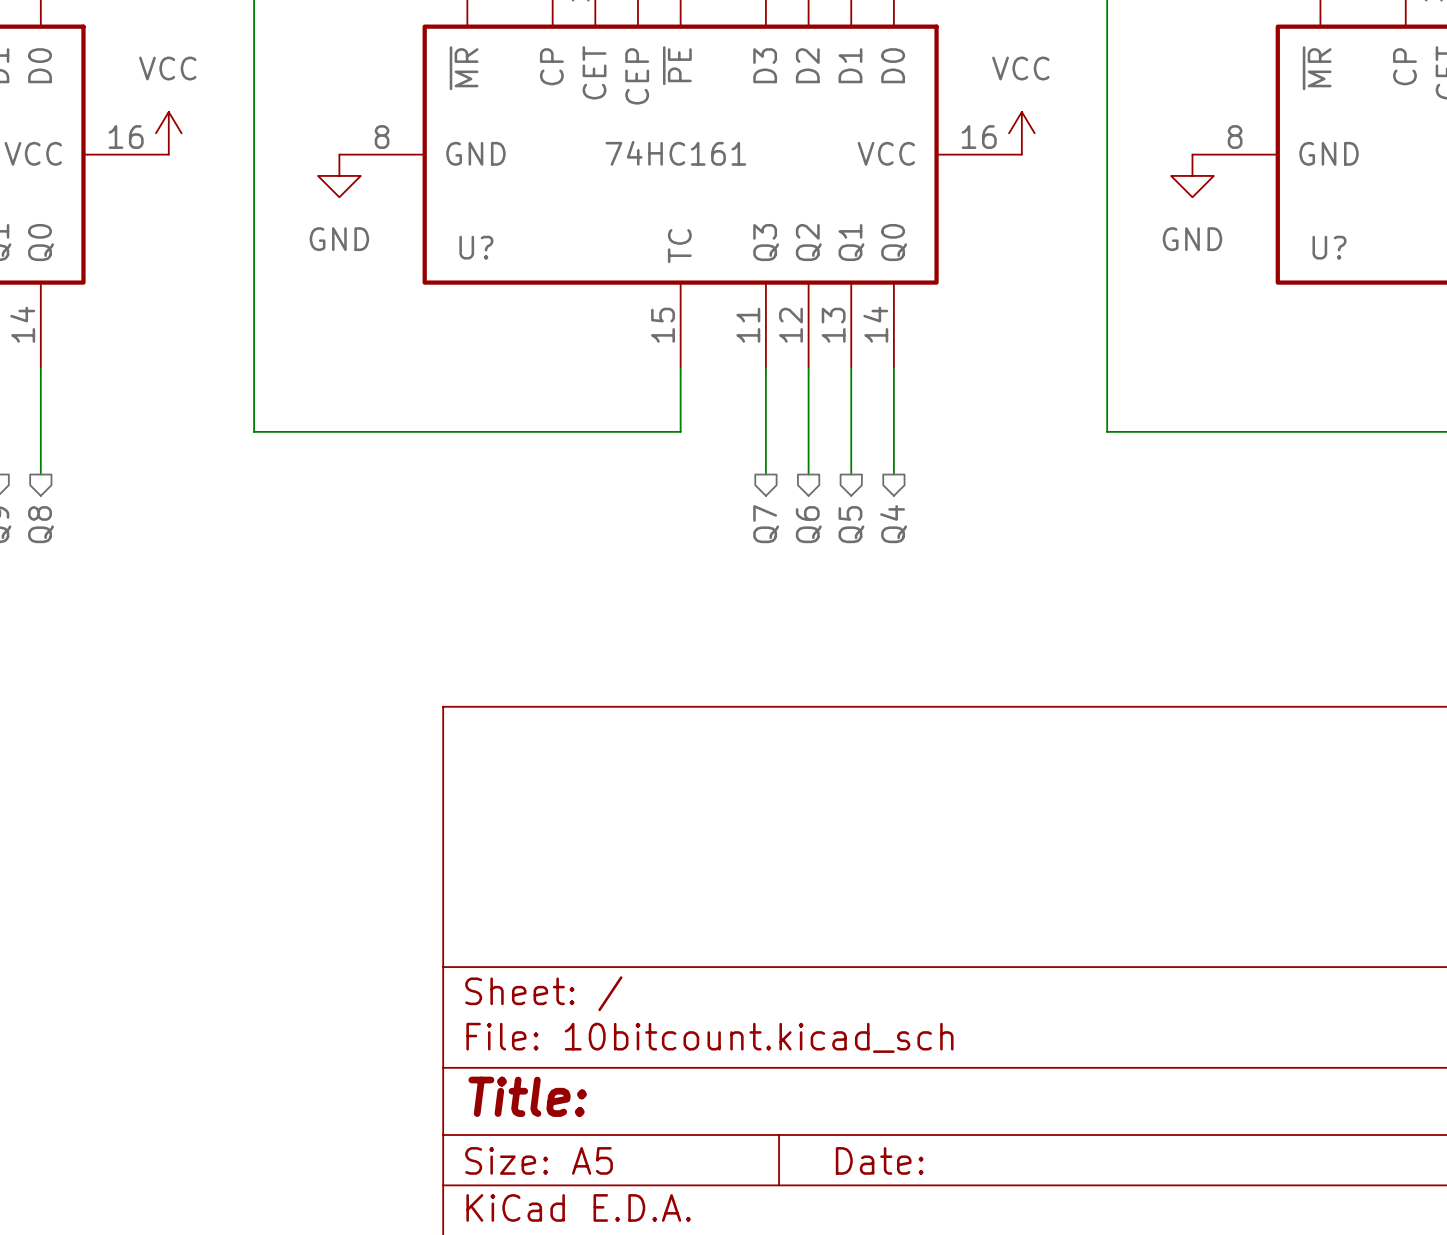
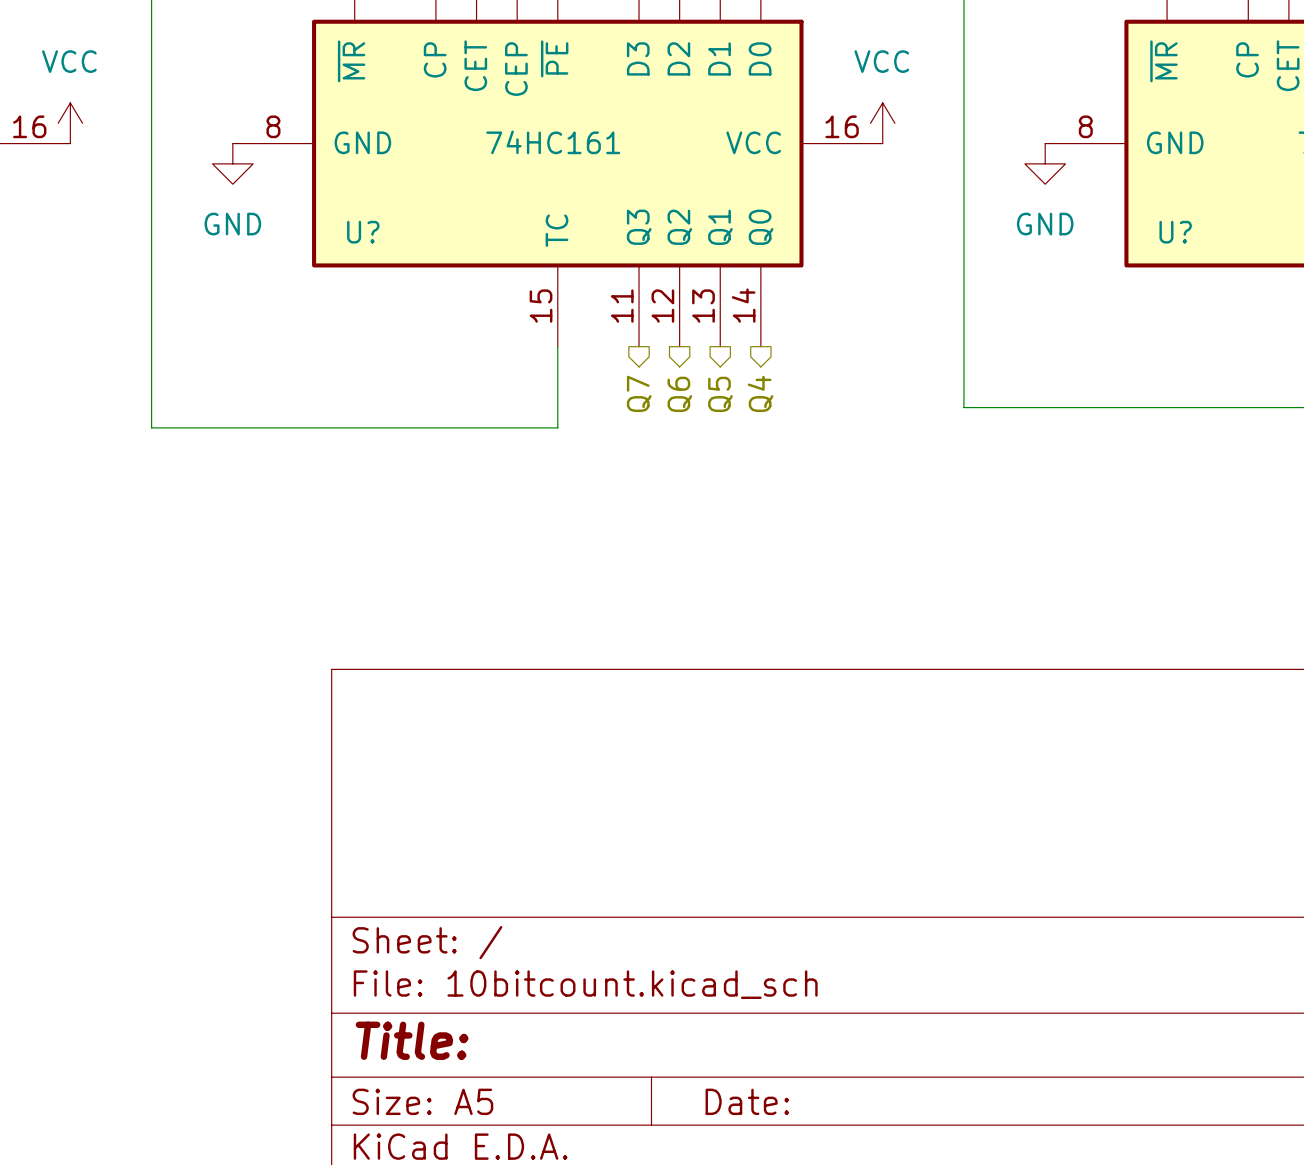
wire: (765, 367) (765, 474) -> none
wire: (808, 367) (808, 474) -> none
wire: (851, 367) (851, 474) -> none
wire: (893, 367) (893, 474) -> none
wire: (254, 431) (680, 431) -> (151, 407) (151, 427) (557, 427) (557, 407)
hierarchical label position: Q7 (766, 524) -> Q7 (639, 393)
hierarchical label position: Q6 (808, 524) -> Q6 (679, 394)
hierarchical label position: Q5 (851, 524) -> Q5 (720, 394)
hierarchical label position: Q4 (893, 524) -> Q4 (760, 393)

